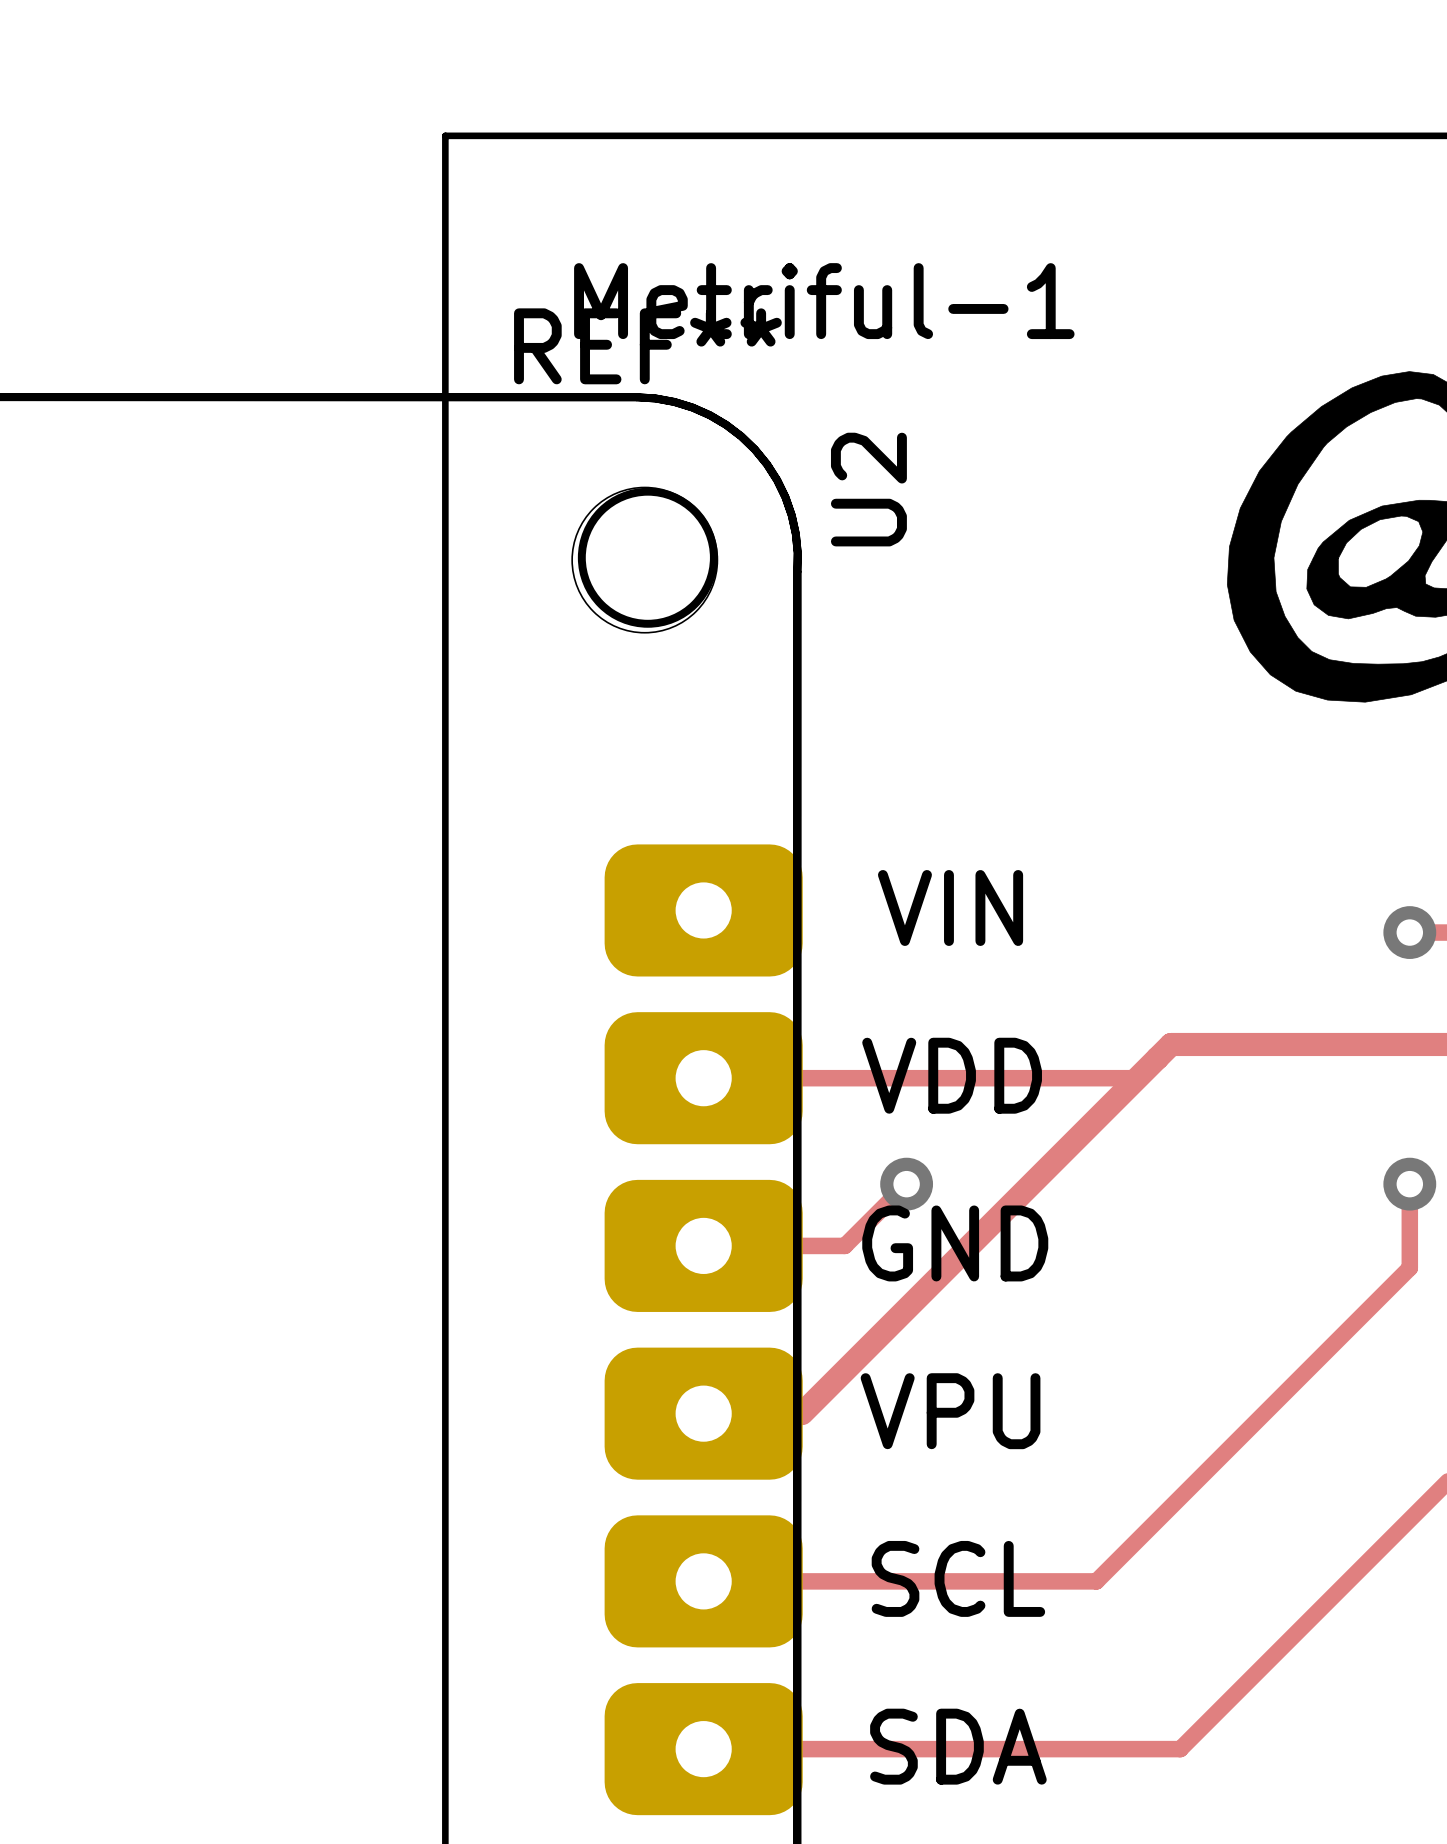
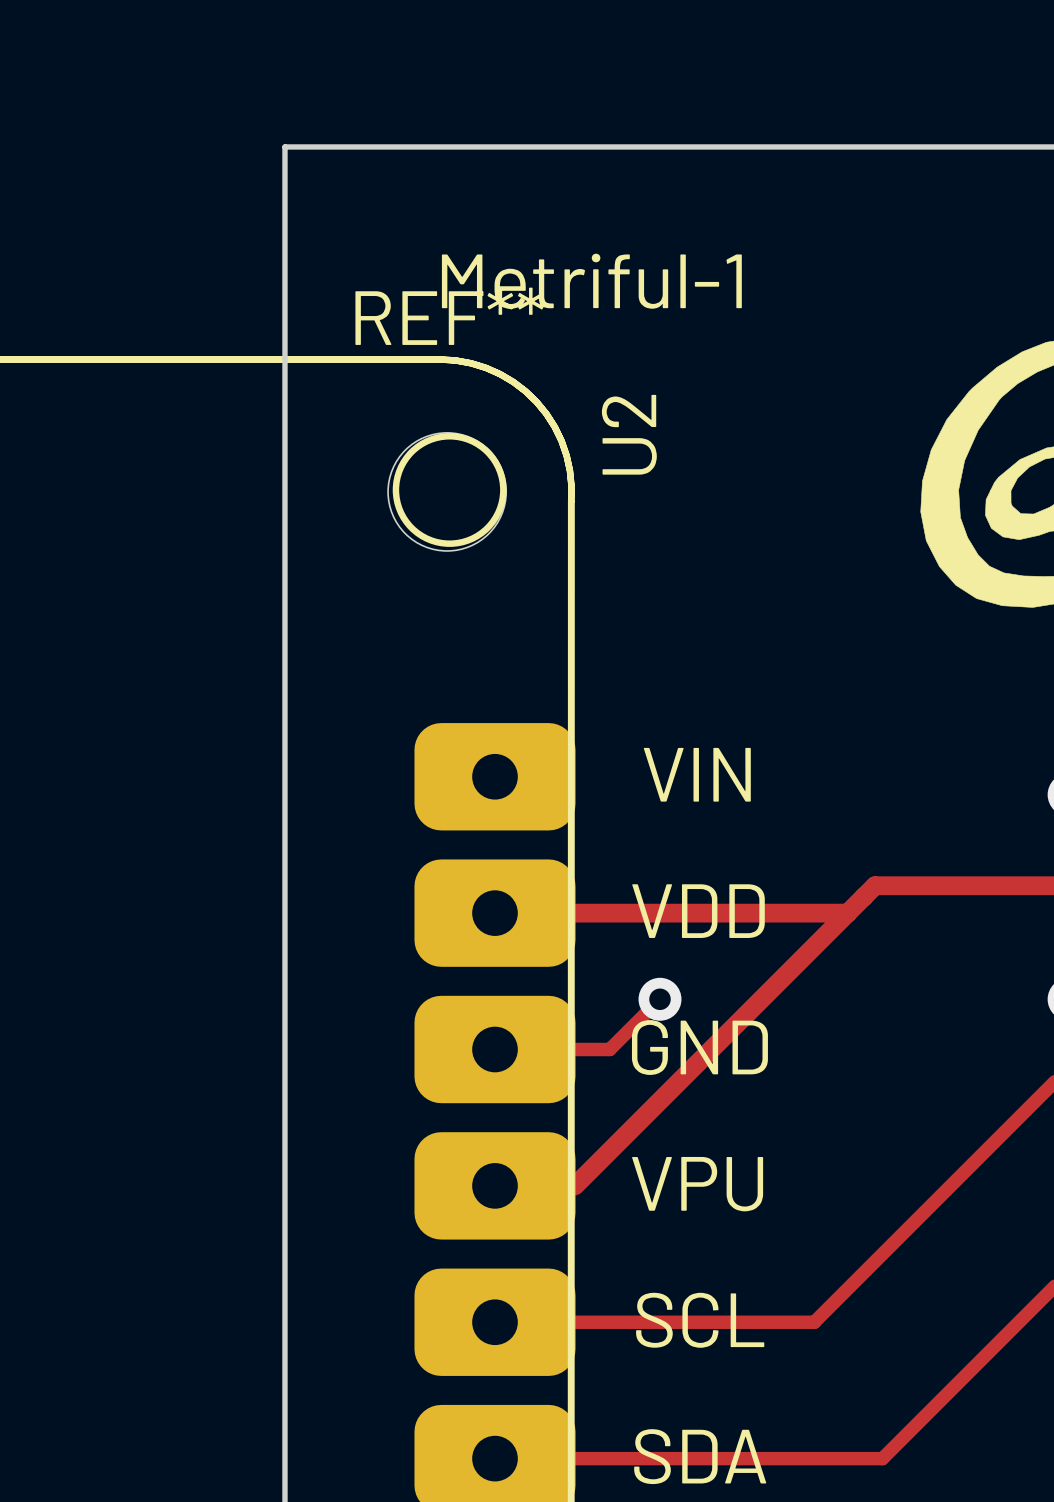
track width: thin (677, 1078) (1137, 1078) -> thick (473, 913) (847, 913)

